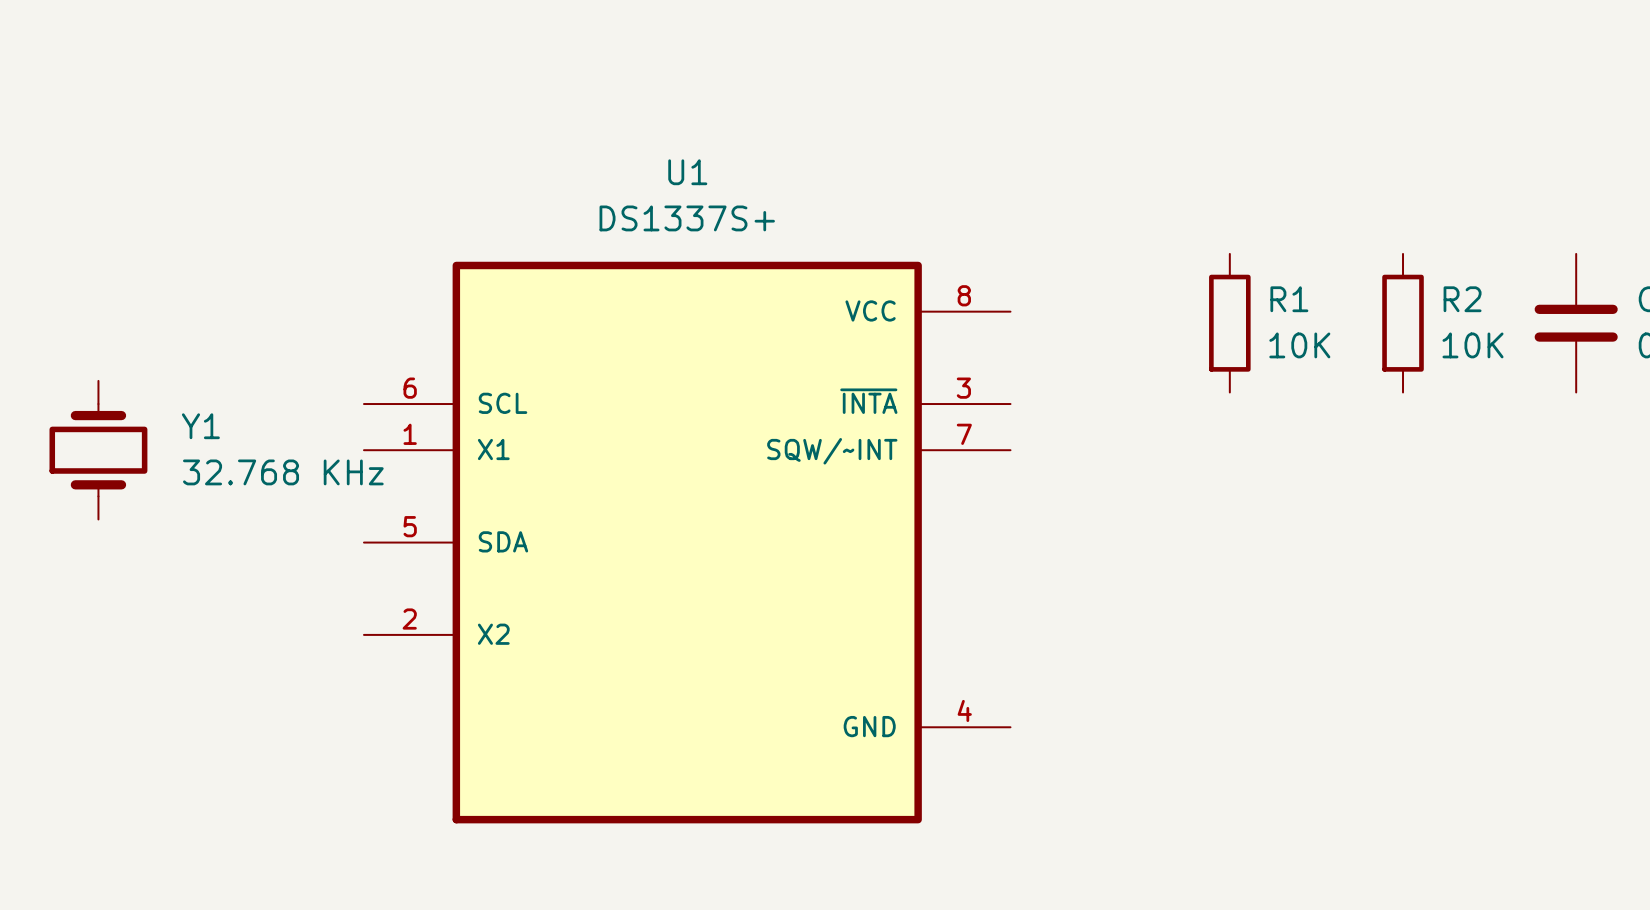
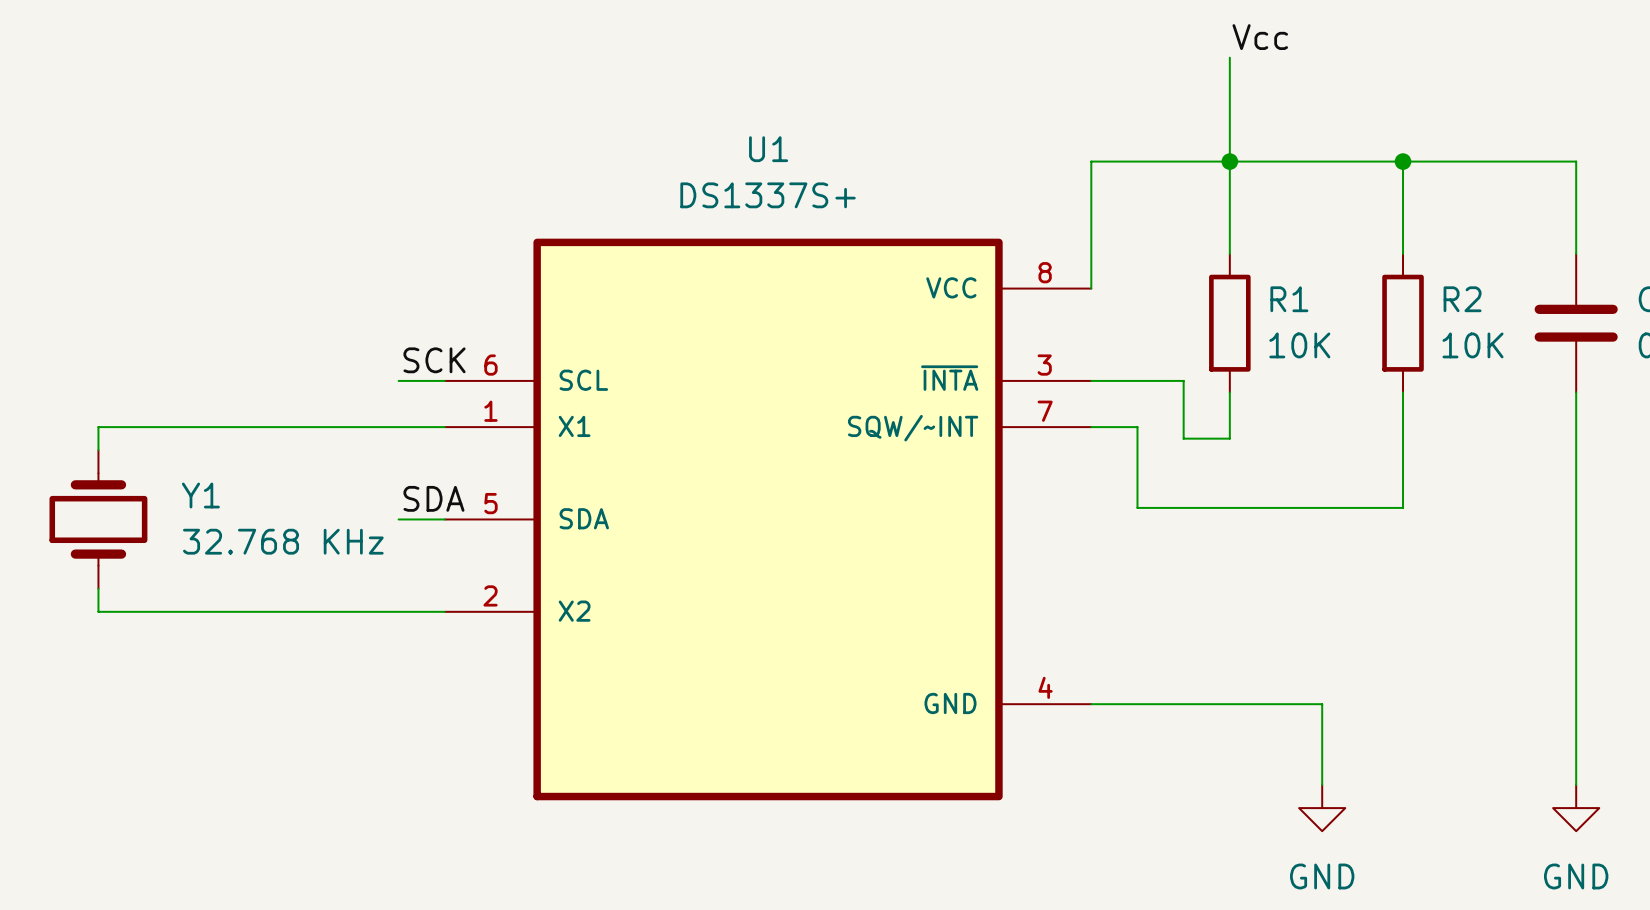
label: none -> Vcc (1260, 37)
wire: none -> (1229, 57) (1229, 253)
junction: none -> (1229, 161)
wire: none -> (1403, 161) (1403, 253)
junction: none -> (1403, 161)
wire: none -> (1576, 253) (1576, 161) (1091, 161) (1091, 288)
label: none -> SCK (434, 360)
wire: none -> (398, 380) (444, 380)
wire: none -> (1091, 380) (1183, 380) (1183, 438) (1229, 438) (1229, 392)
wire: none -> (1403, 392) (1403, 507) (1137, 507) (1137, 427) (1091, 427)
wire: none -> (1576, 392) (1576, 785)
wire: none -> (444, 427) (98, 427) (98, 450)
Y1 position: (98, 450) -> (98, 519)
label: none -> SDA (433, 498)
wire: none -> (398, 519) (444, 519)
U1 position: (687, 542) -> (768, 519)
wire: none -> (98, 588) (98, 611) (444, 611)
wire: none -> (1091, 704) (1322, 704) (1322, 785)
power symbol: none -> GND (1322, 808)
power symbol: none -> GND (1576, 808)

